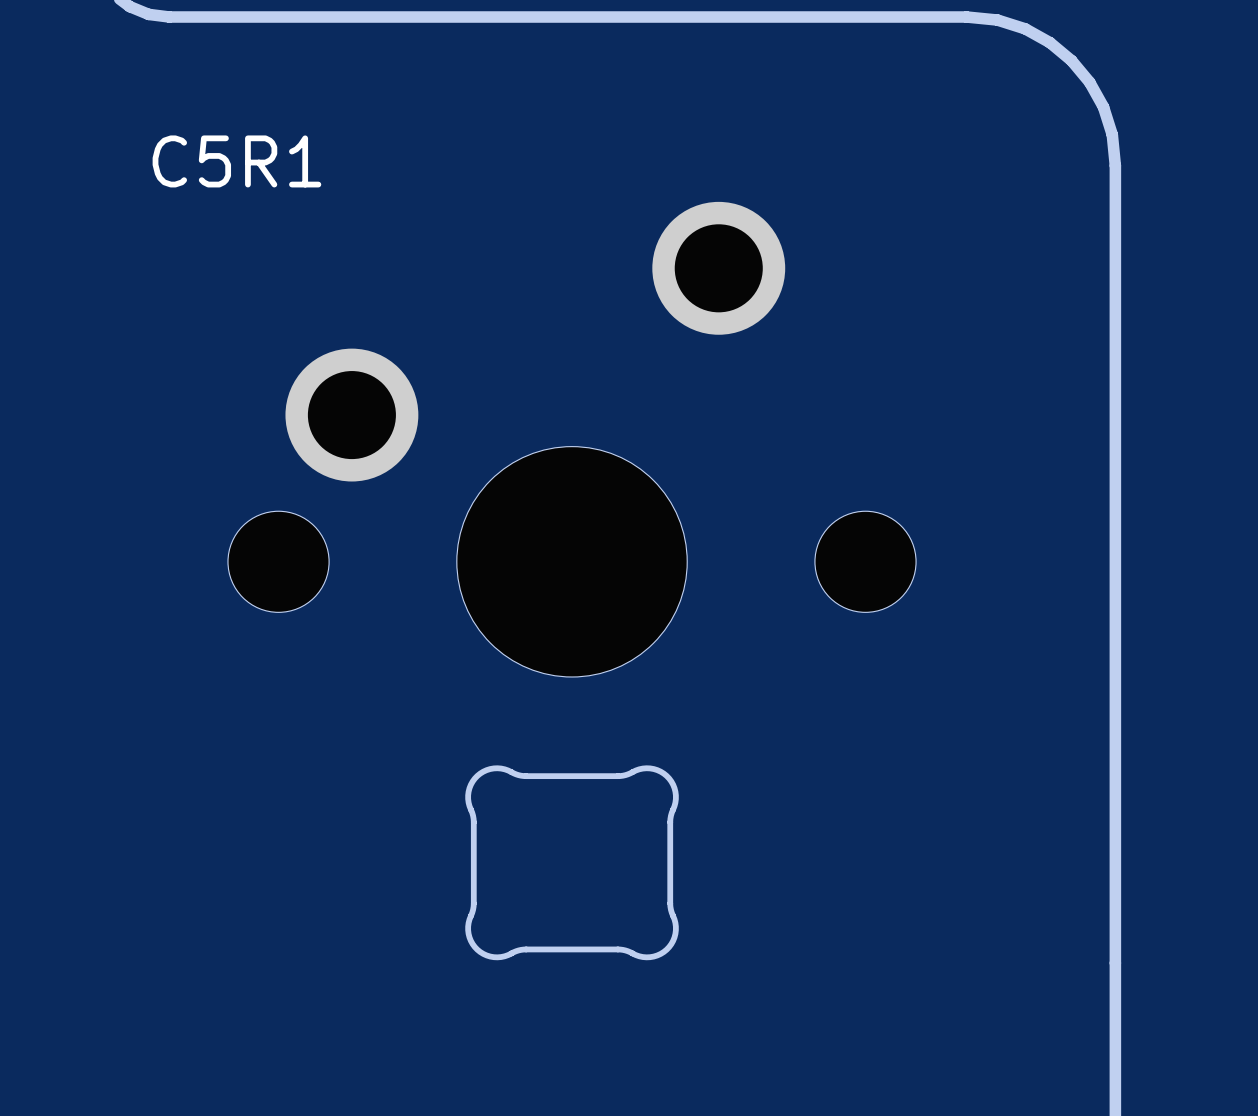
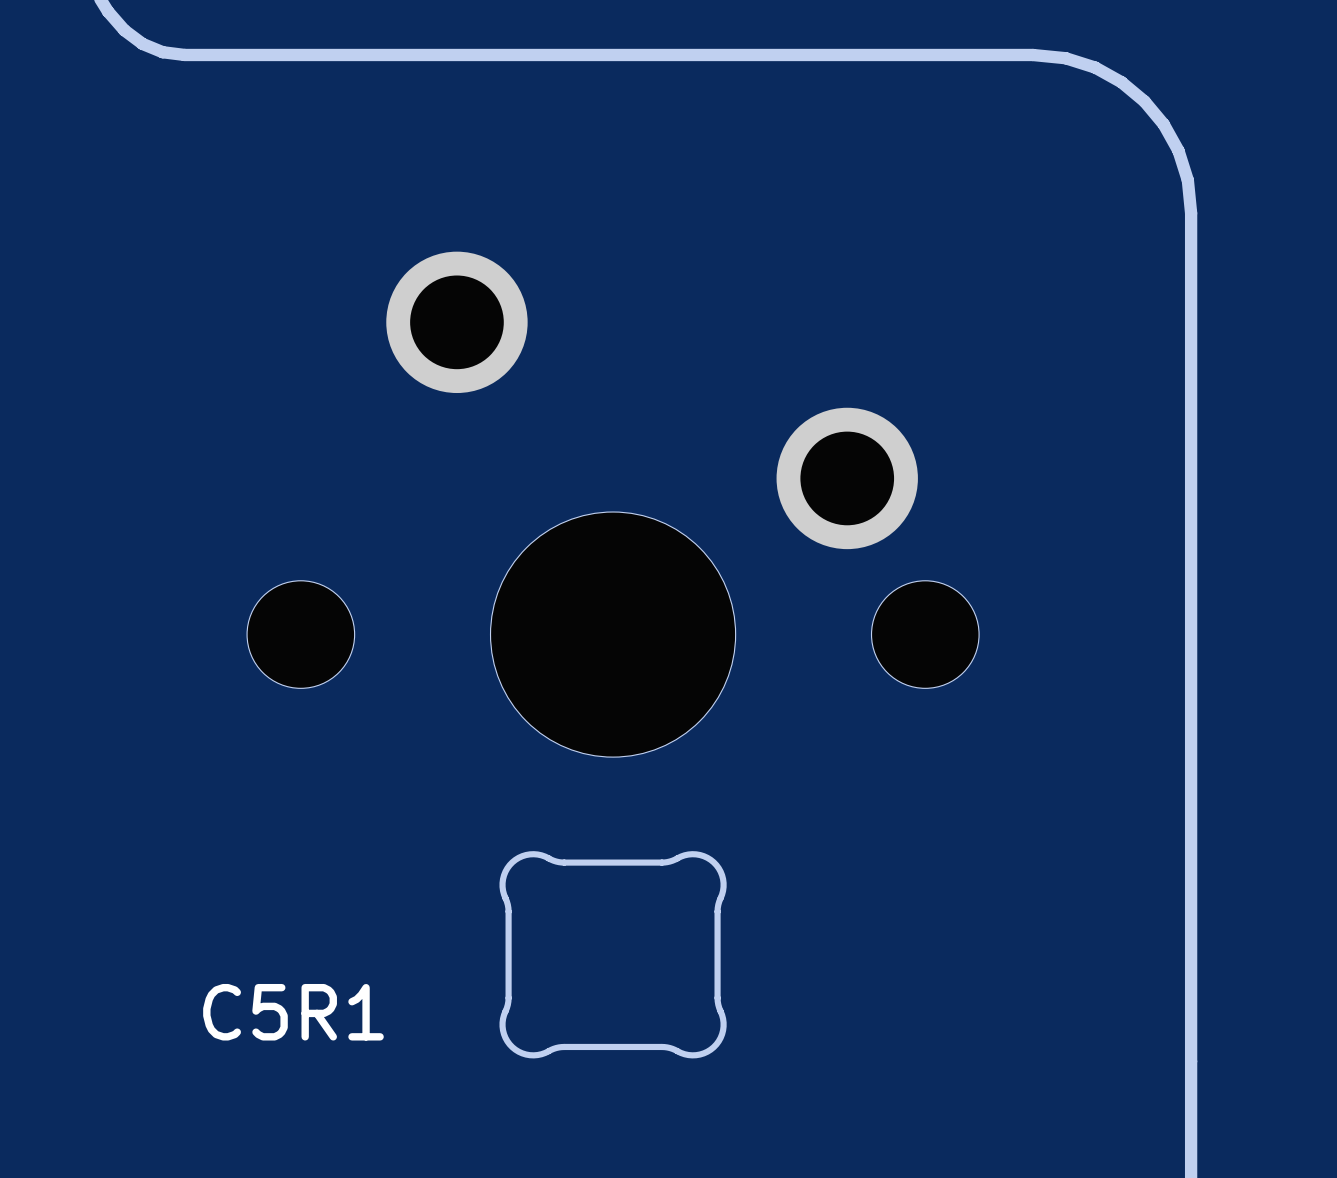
C5R1: (572, 581) -> none
part: none -> (613, 655)
text: none -> C5R1 (293, 1012)

